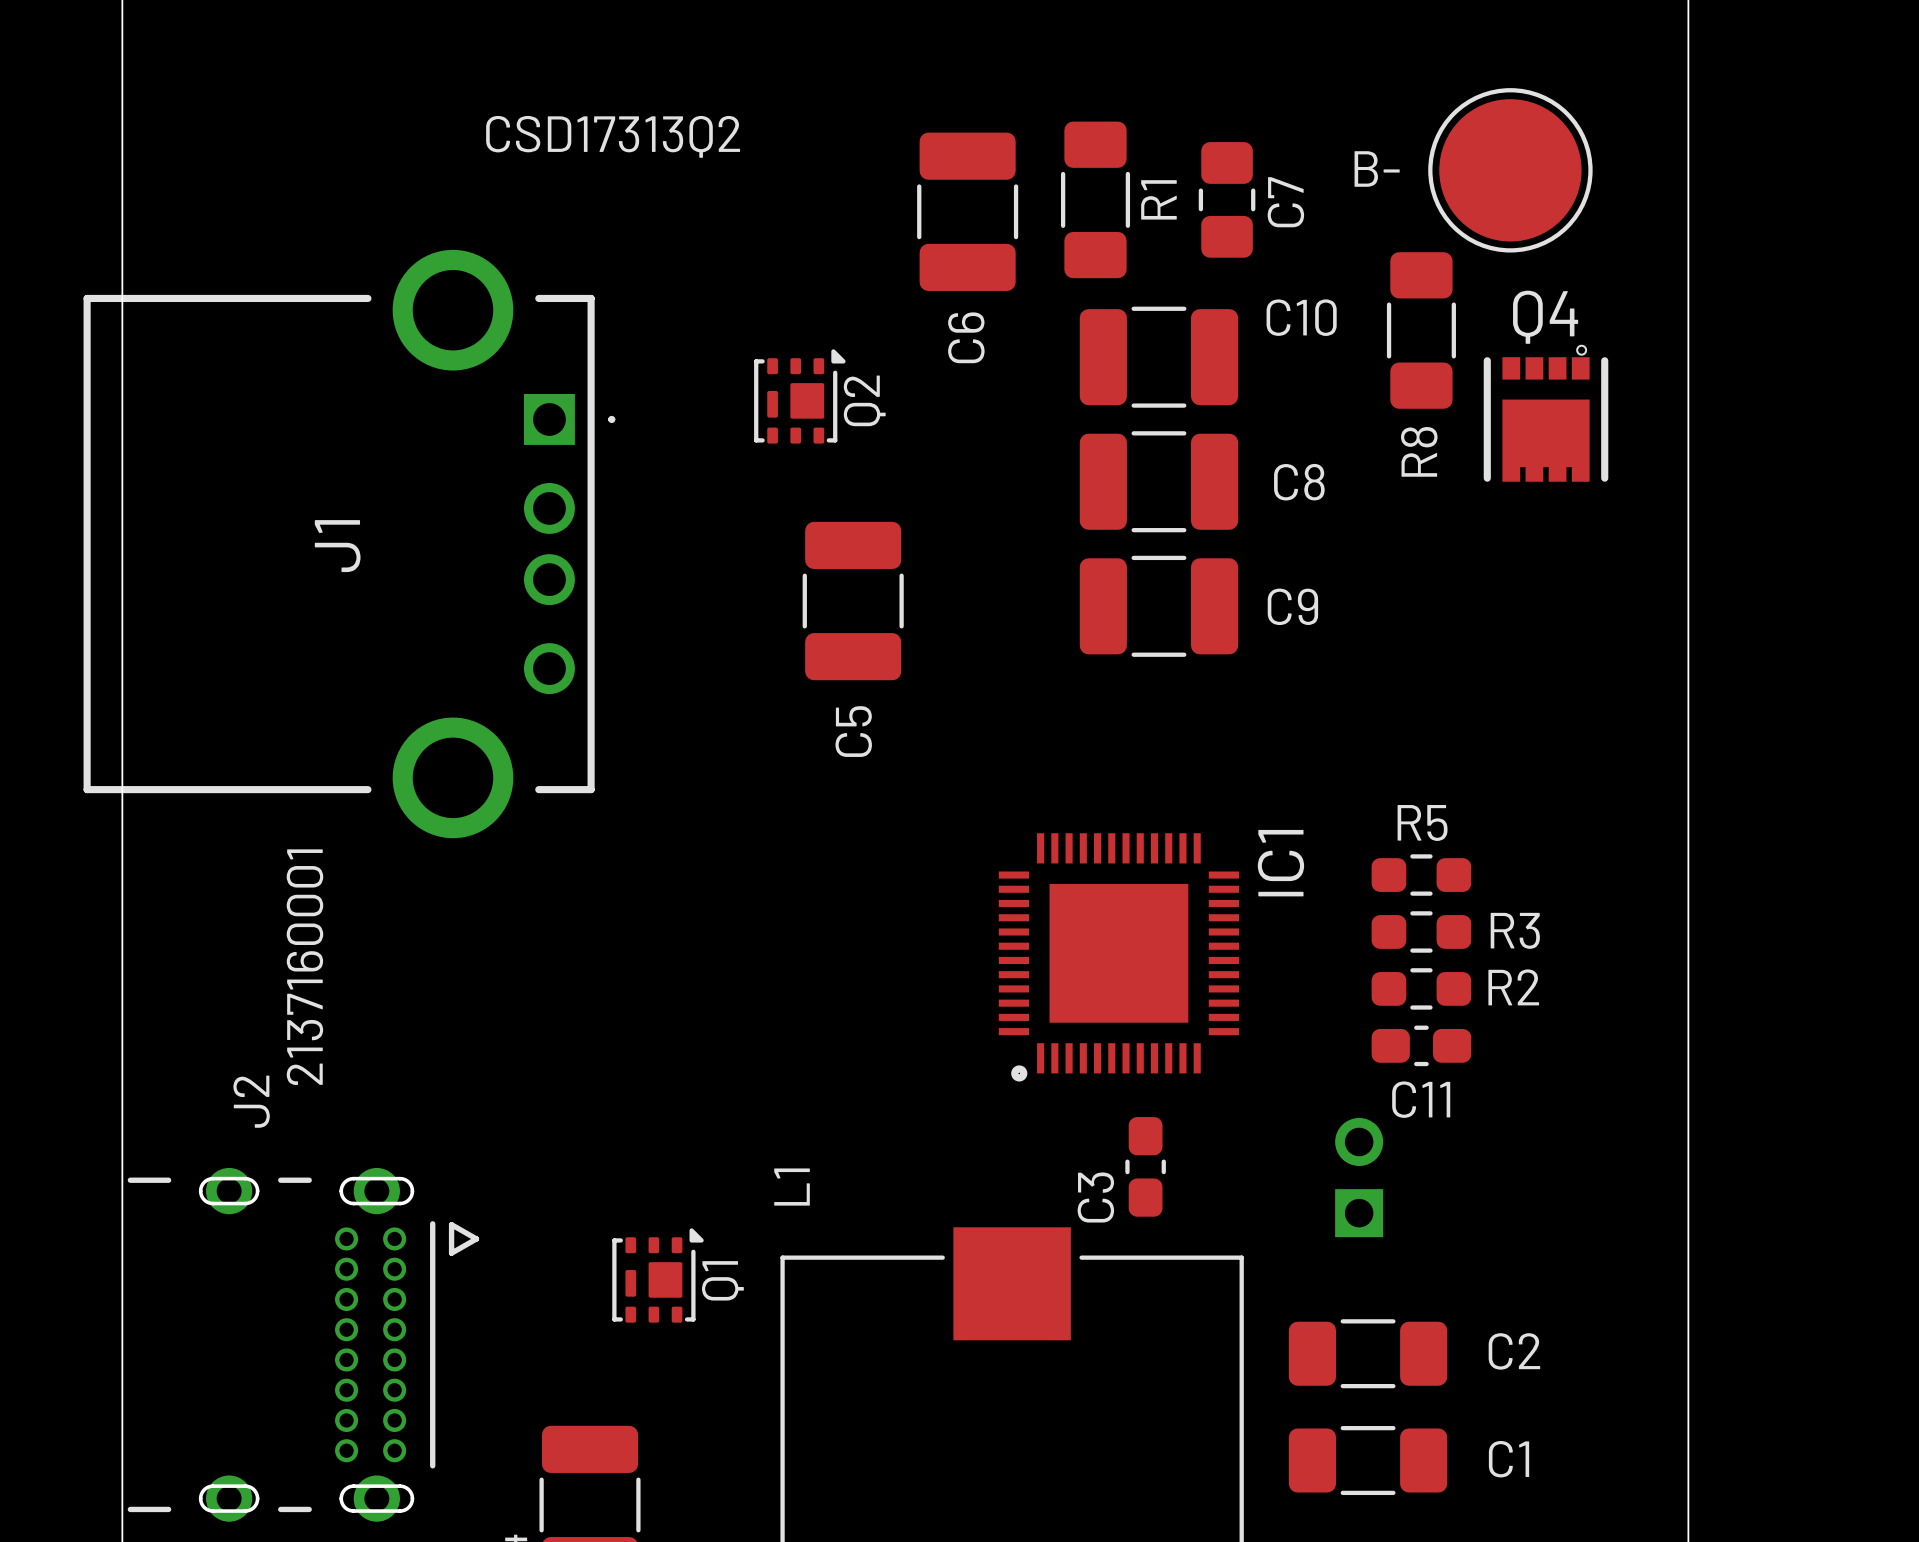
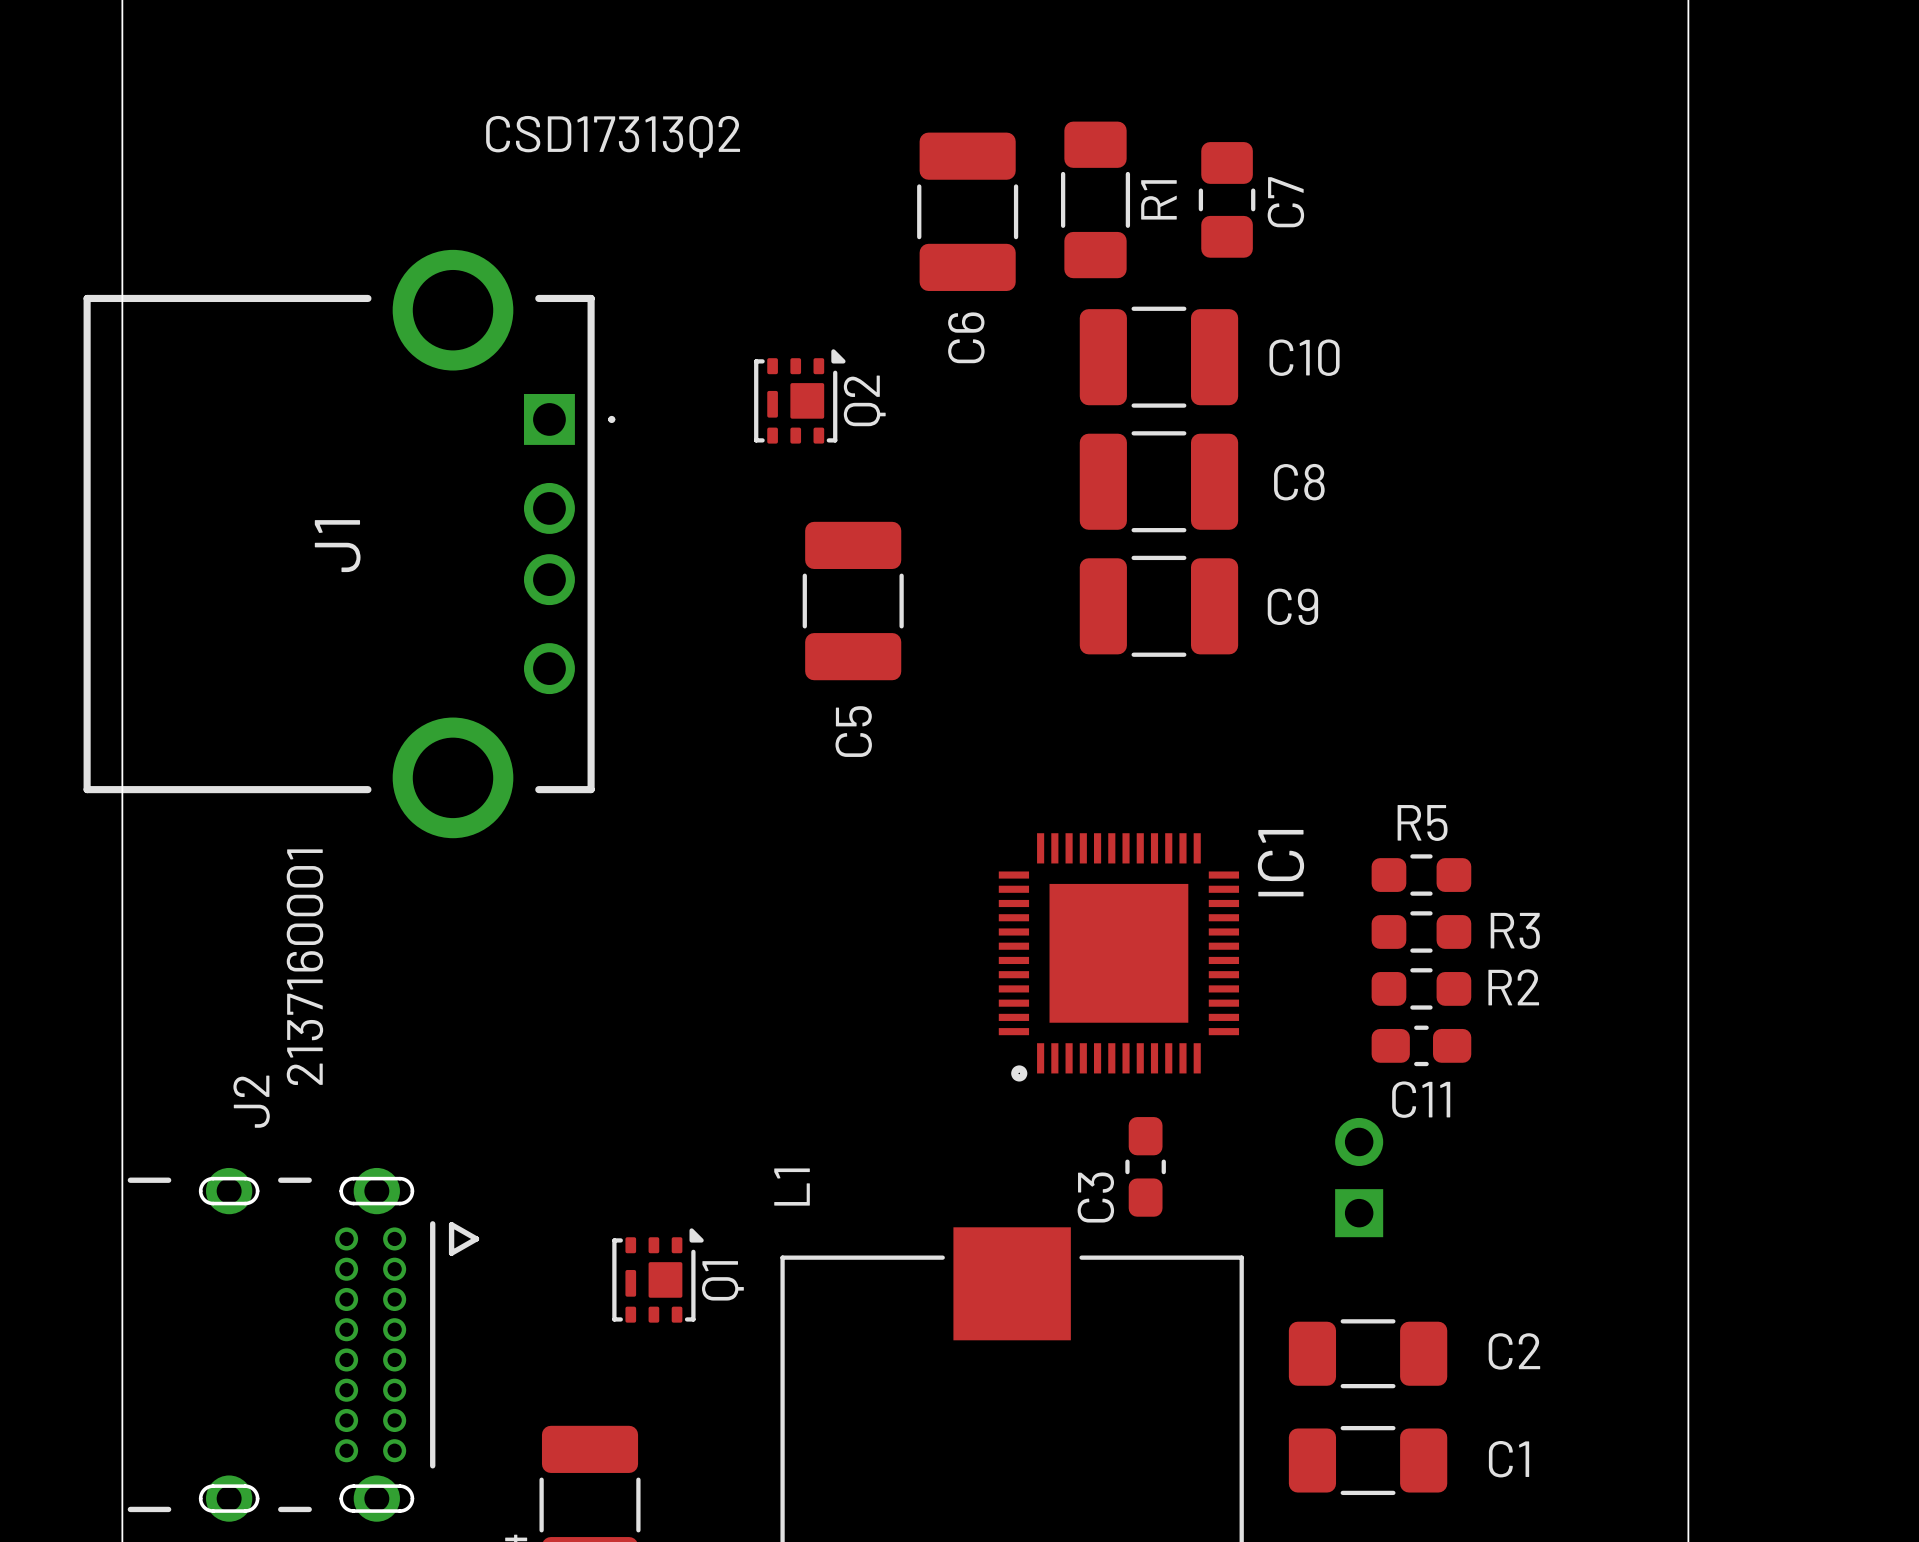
part: B- (1510, 170) -> none
C10 name position: C10 (1301, 317) -> C10 (1304, 357)
R8: (1421, 330) -> none
Q4: (1546, 413) -> none

